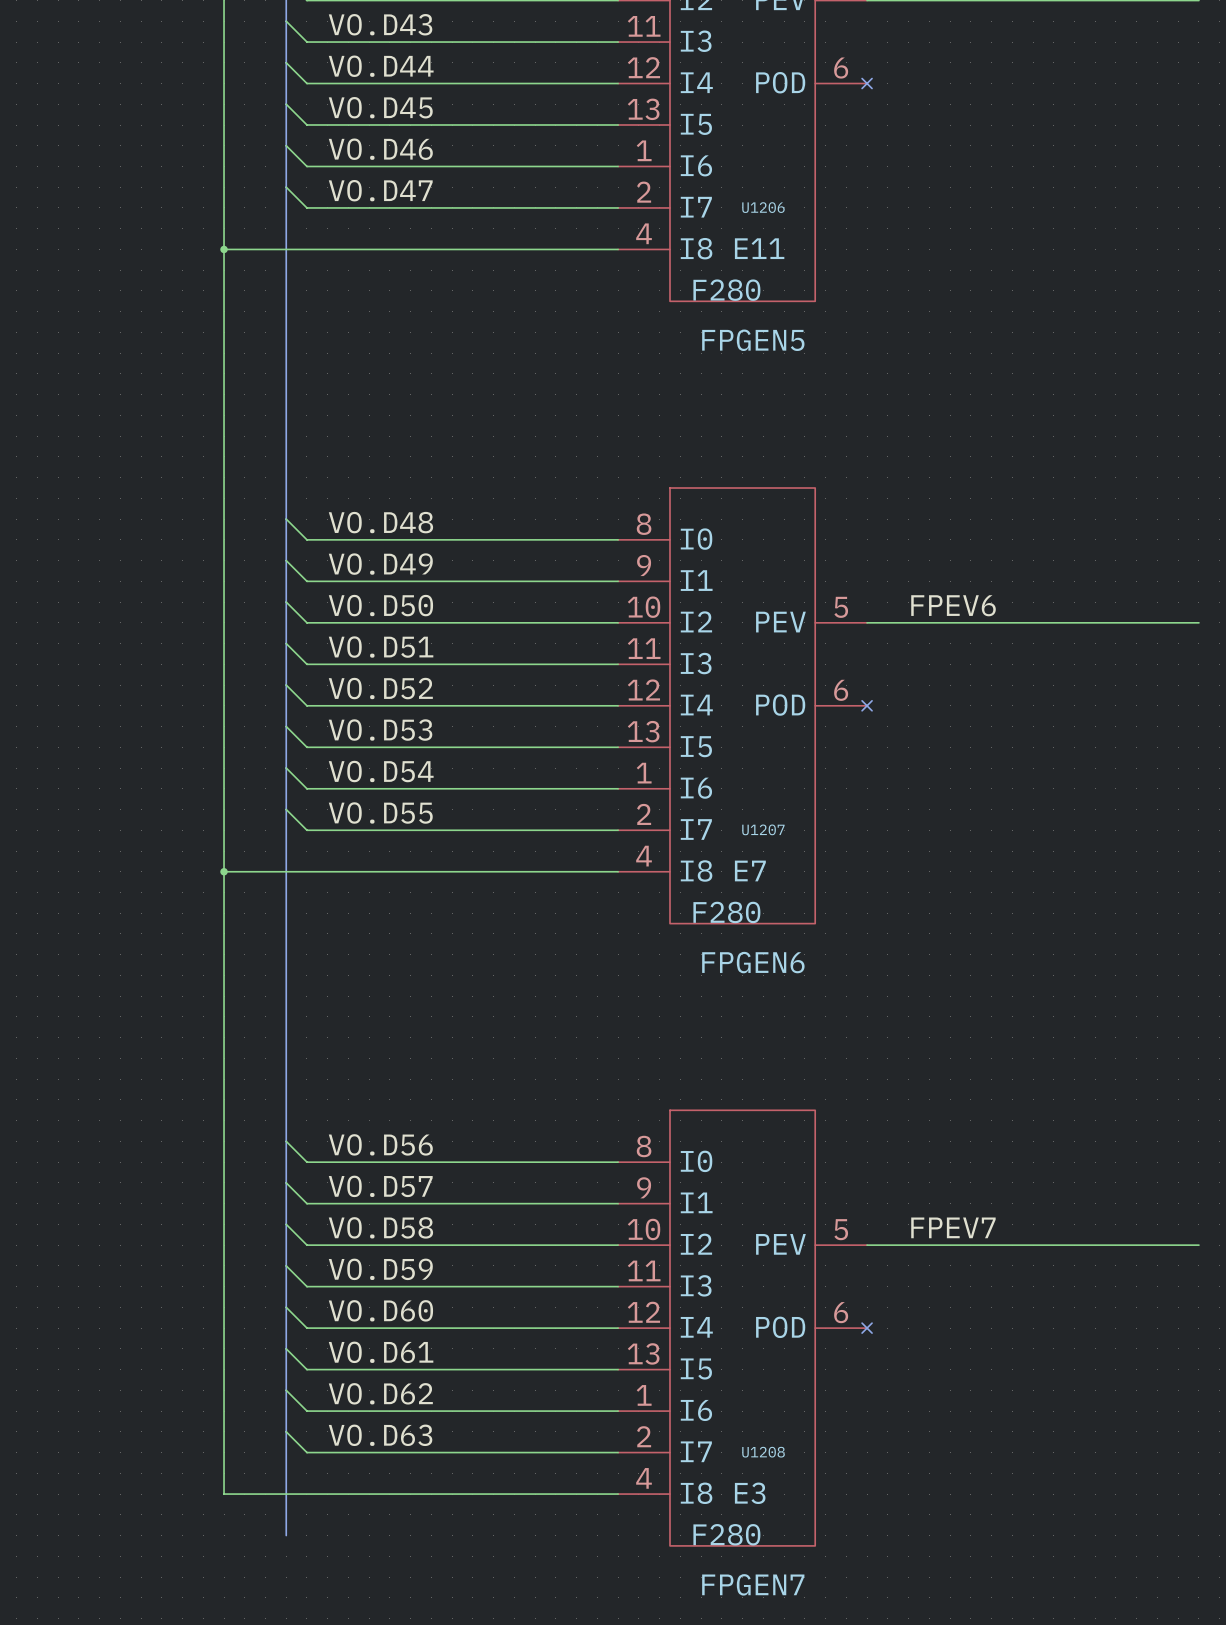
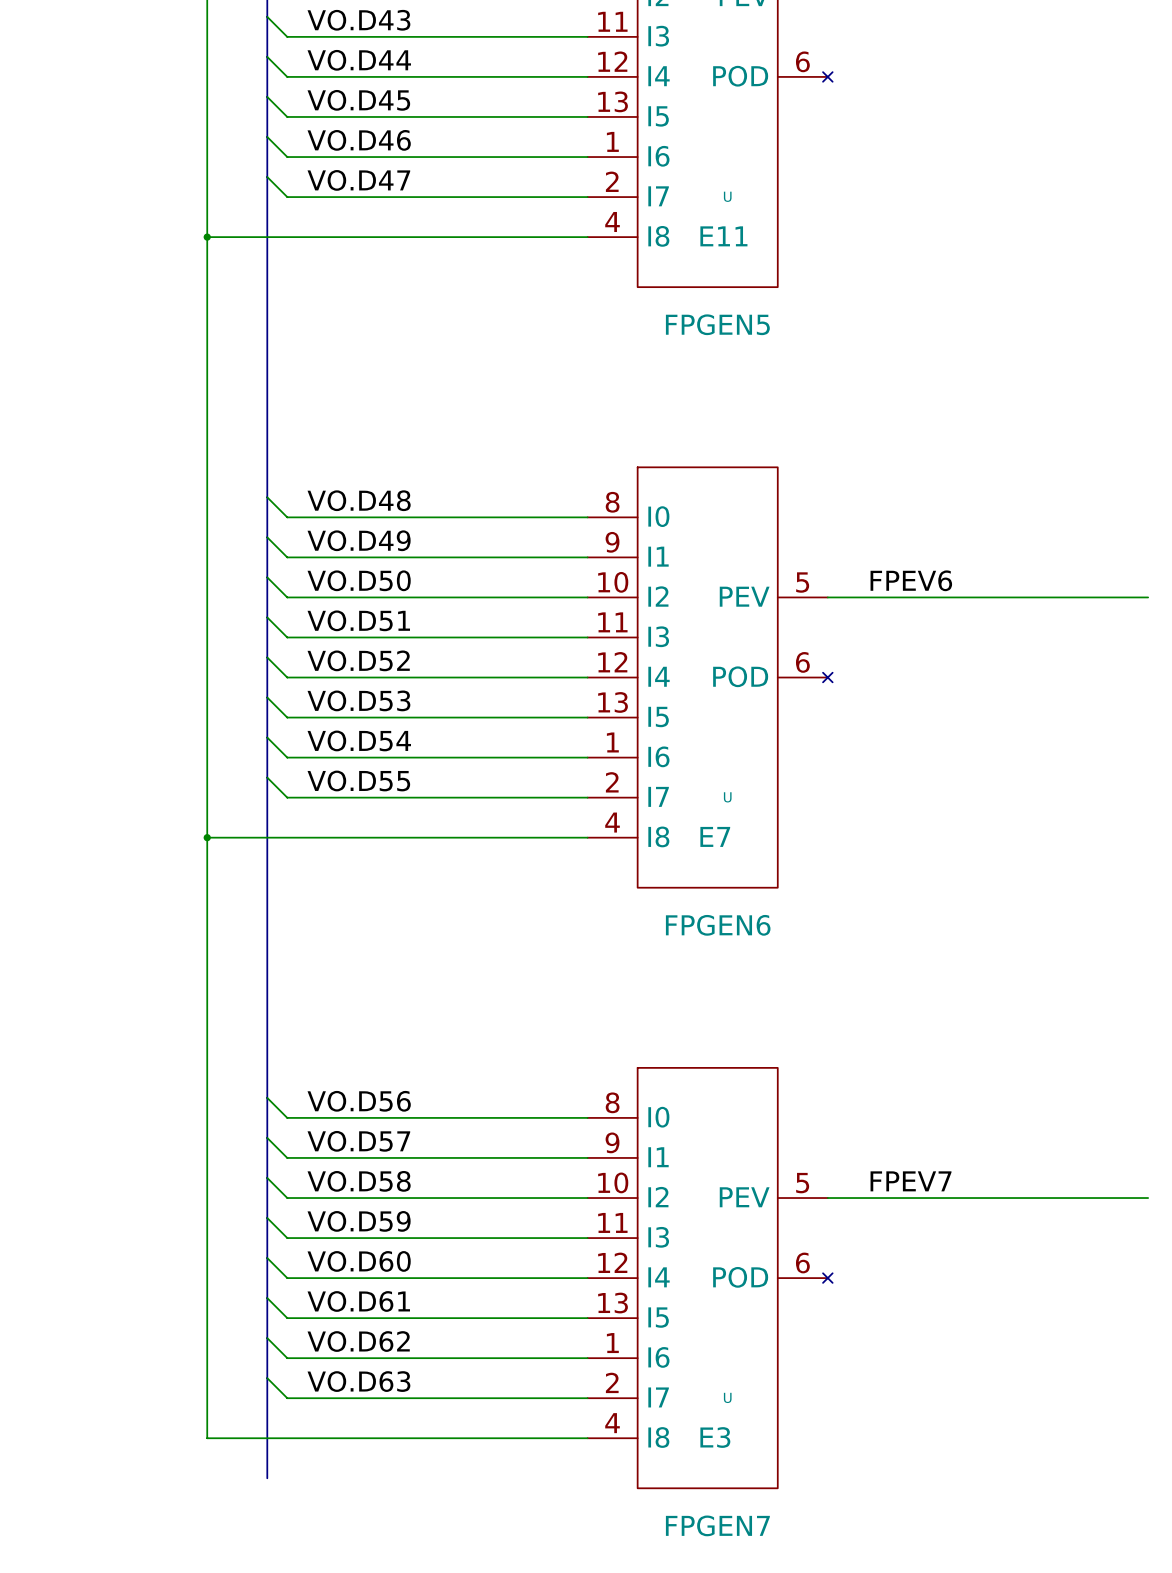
U1206 name: U1206 (763, 207) -> U (727, 196)
U1206 value: F280 (726, 290) -> none
U1207 name: U1207 (763, 829) -> U (727, 797)
U1207 value: F280 (726, 912) -> none
U1208 name: U1208 (763, 1452) -> U (727, 1397)
U1208 value: F280 (726, 1534) -> none

